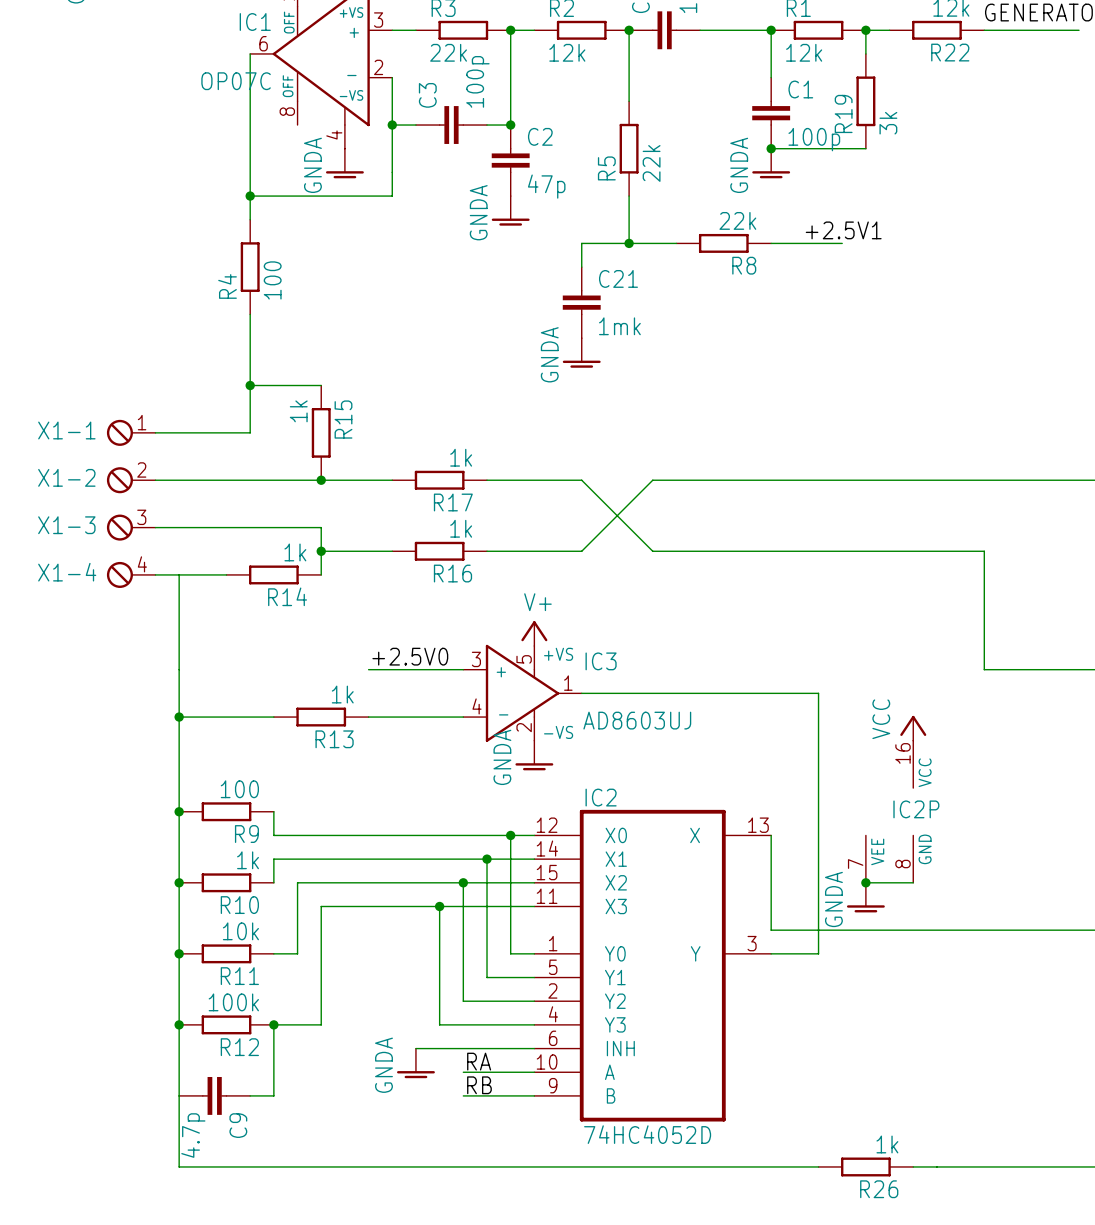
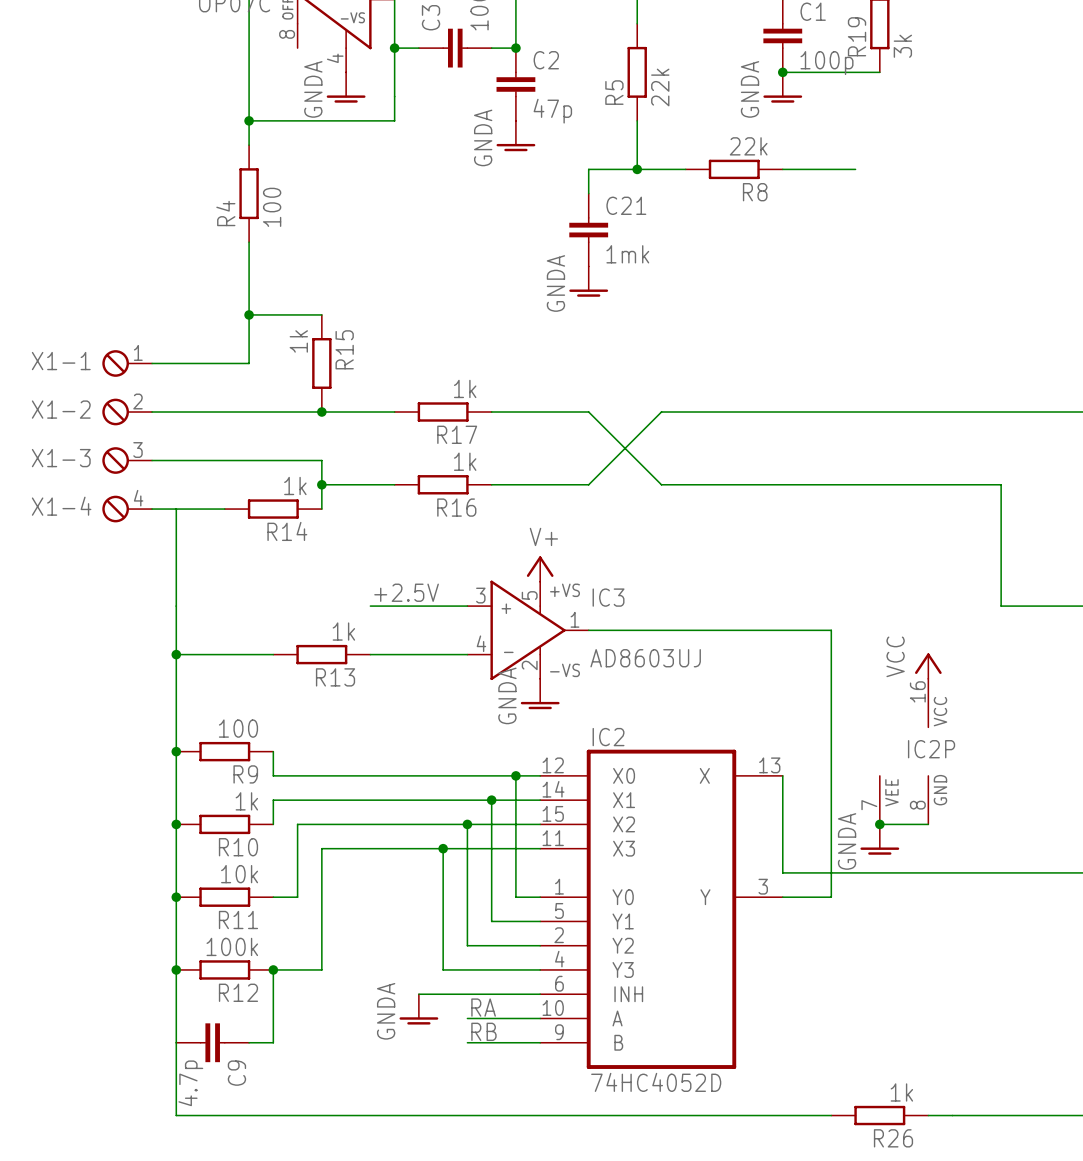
label: +2.5V1 (843, 230) -> none
label: +2.5V0 (410, 656) -> +2.5V (406, 592)

